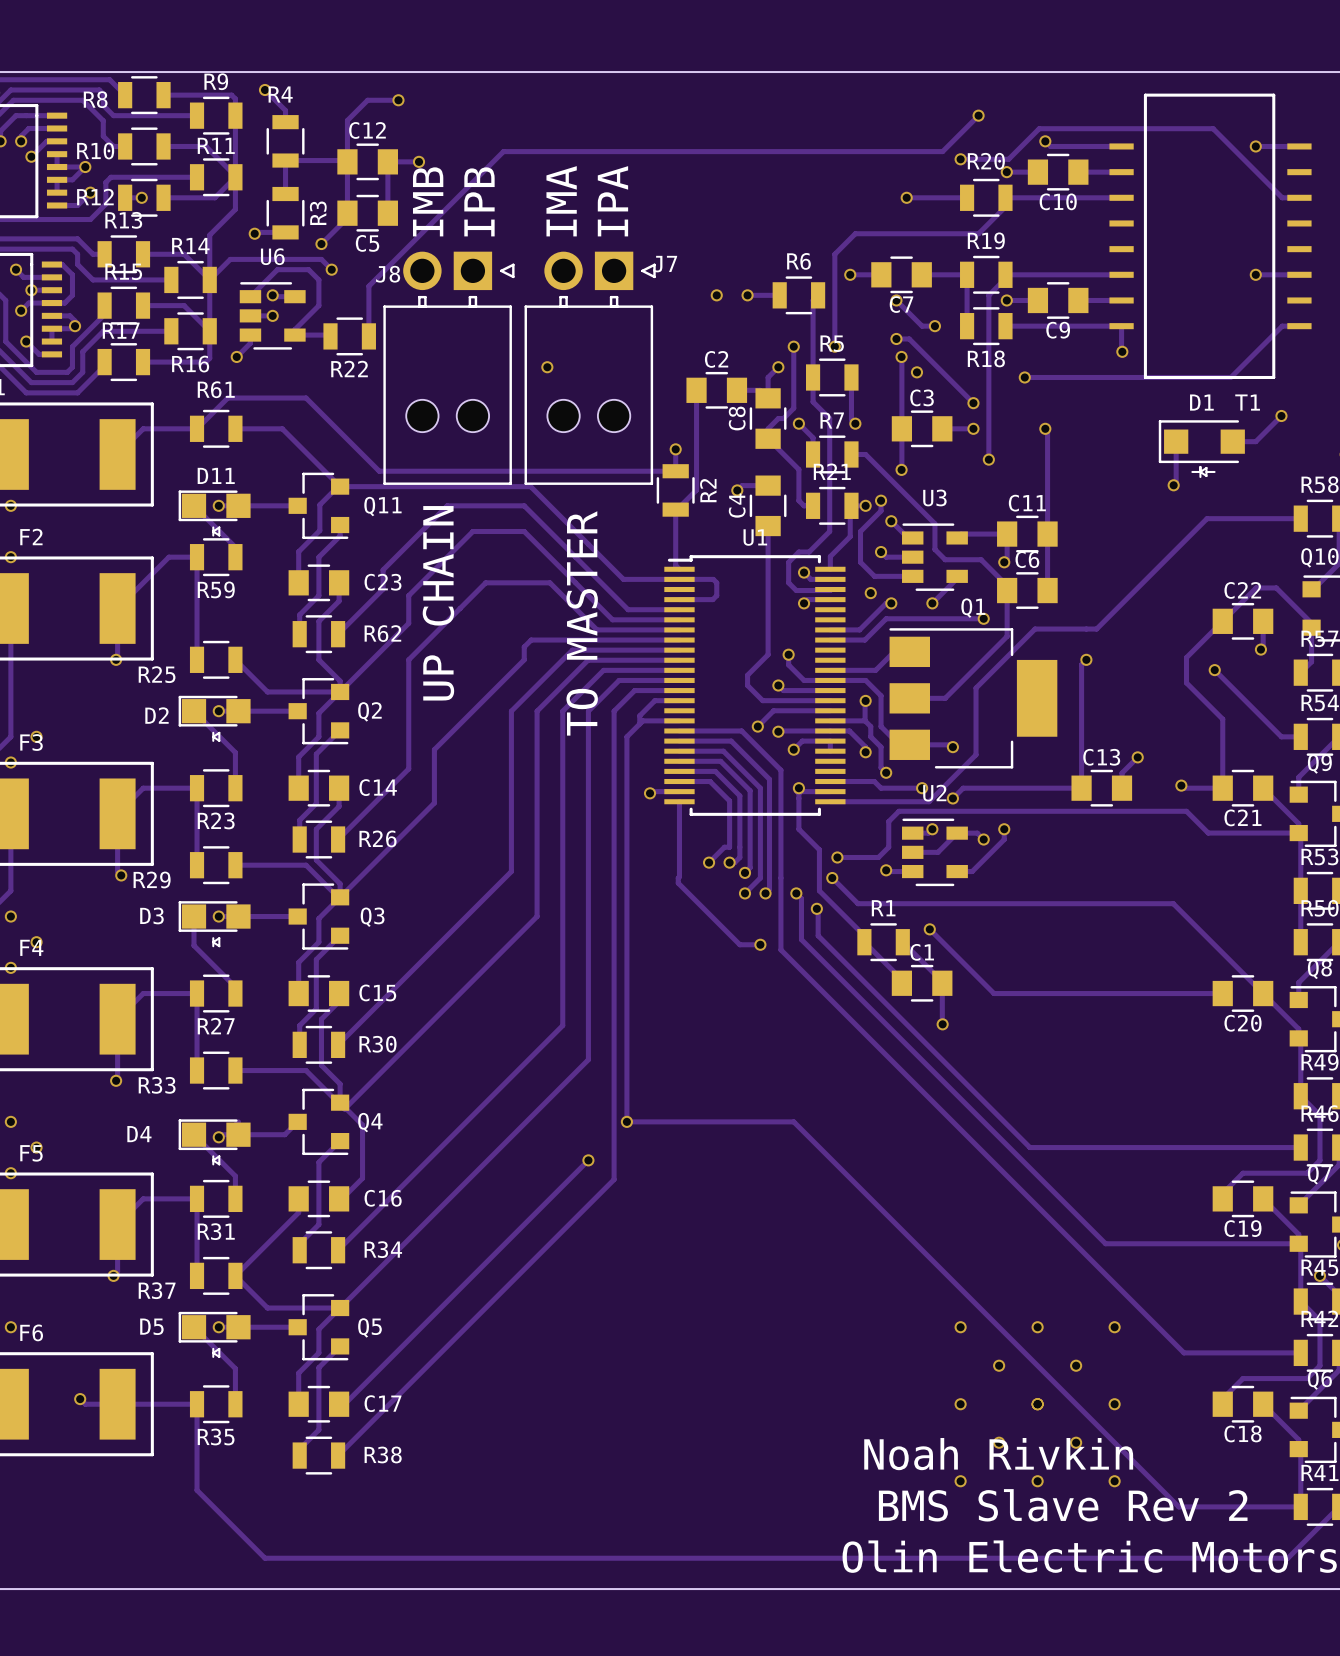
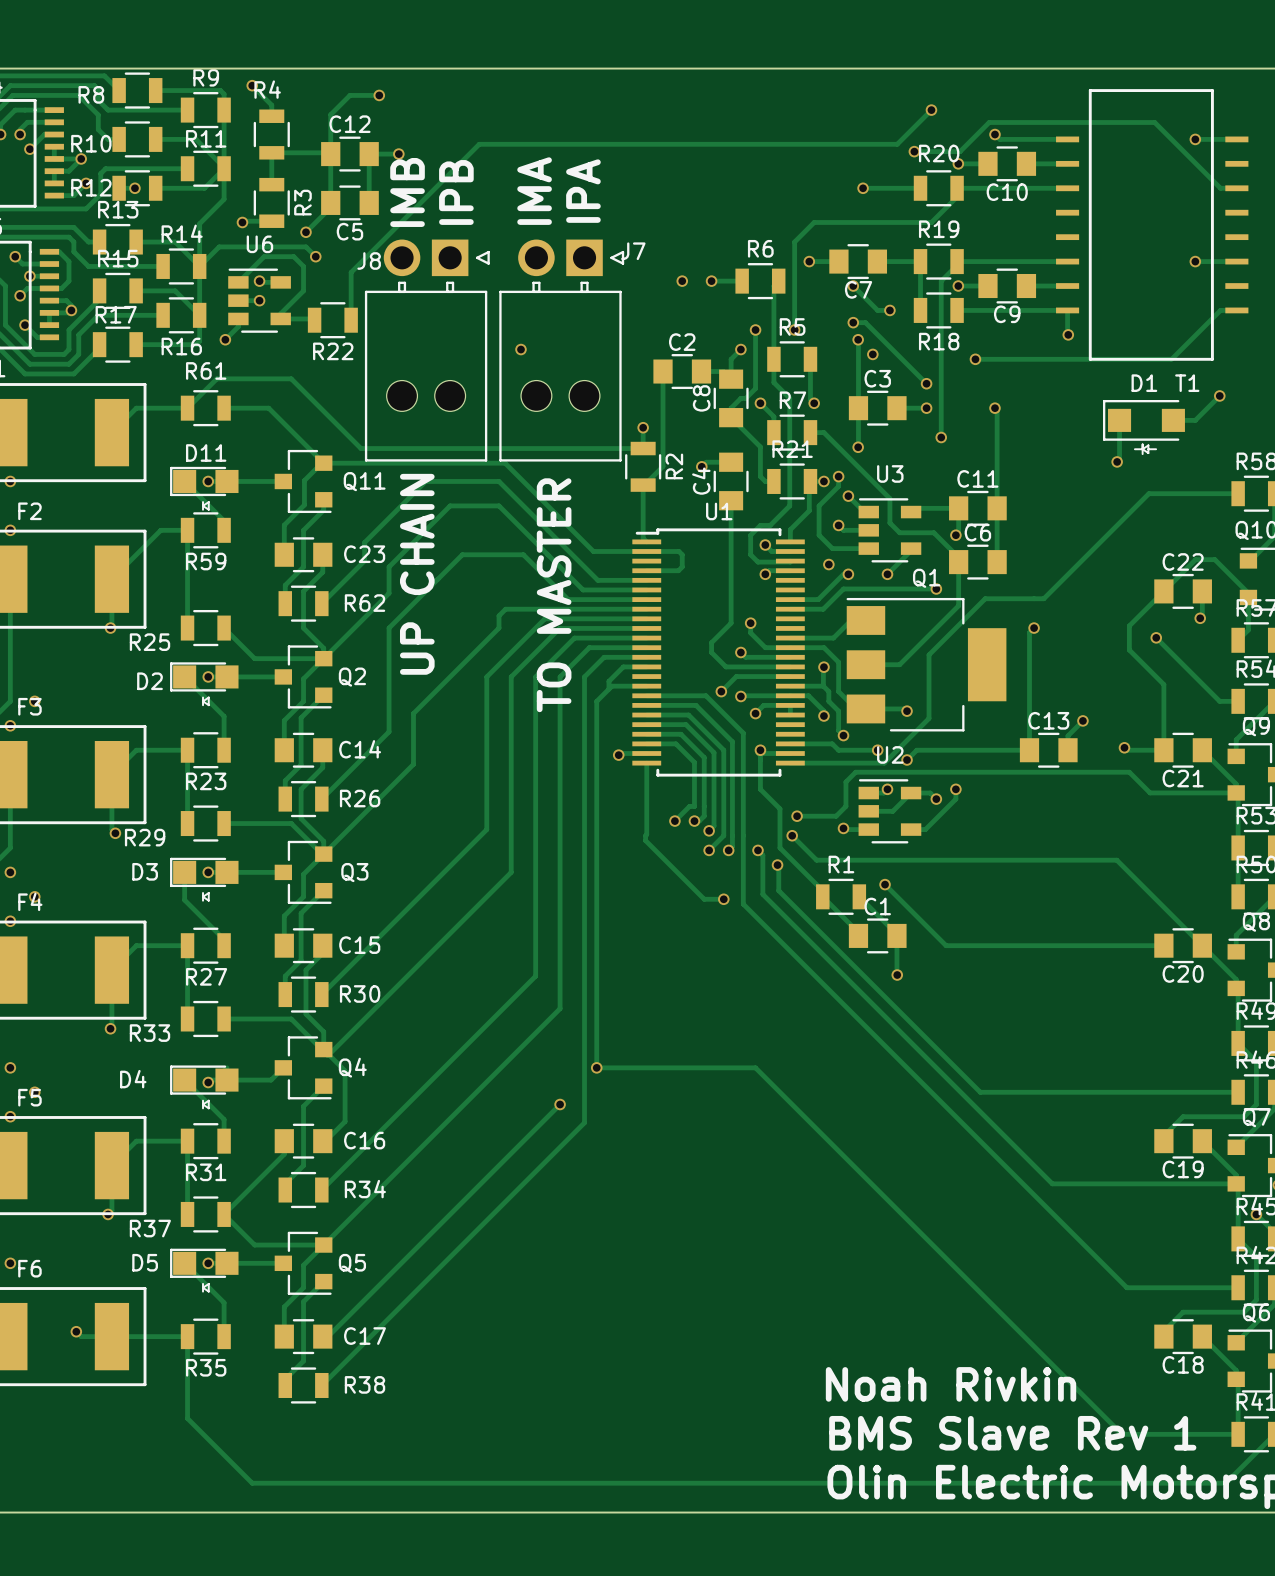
via: (960, 1327) -> none
via: (1037, 1327) -> none
via: (1114, 1327) -> none
via: (999, 1365) -> none
via: (1076, 1365) -> none
via: (960, 1404) -> none
via: (1037, 1404) -> none
via: (1114, 1404) -> none
via: (999, 1442) -> none
via: (1076, 1442) -> none
via: (960, 1481) -> none
via: (1037, 1481) -> none
via: (1114, 1481) -> none
text: BMS Slave Rev 2 (1063, 1505) -> BMS Slave Rev 1 (1012, 1433)

